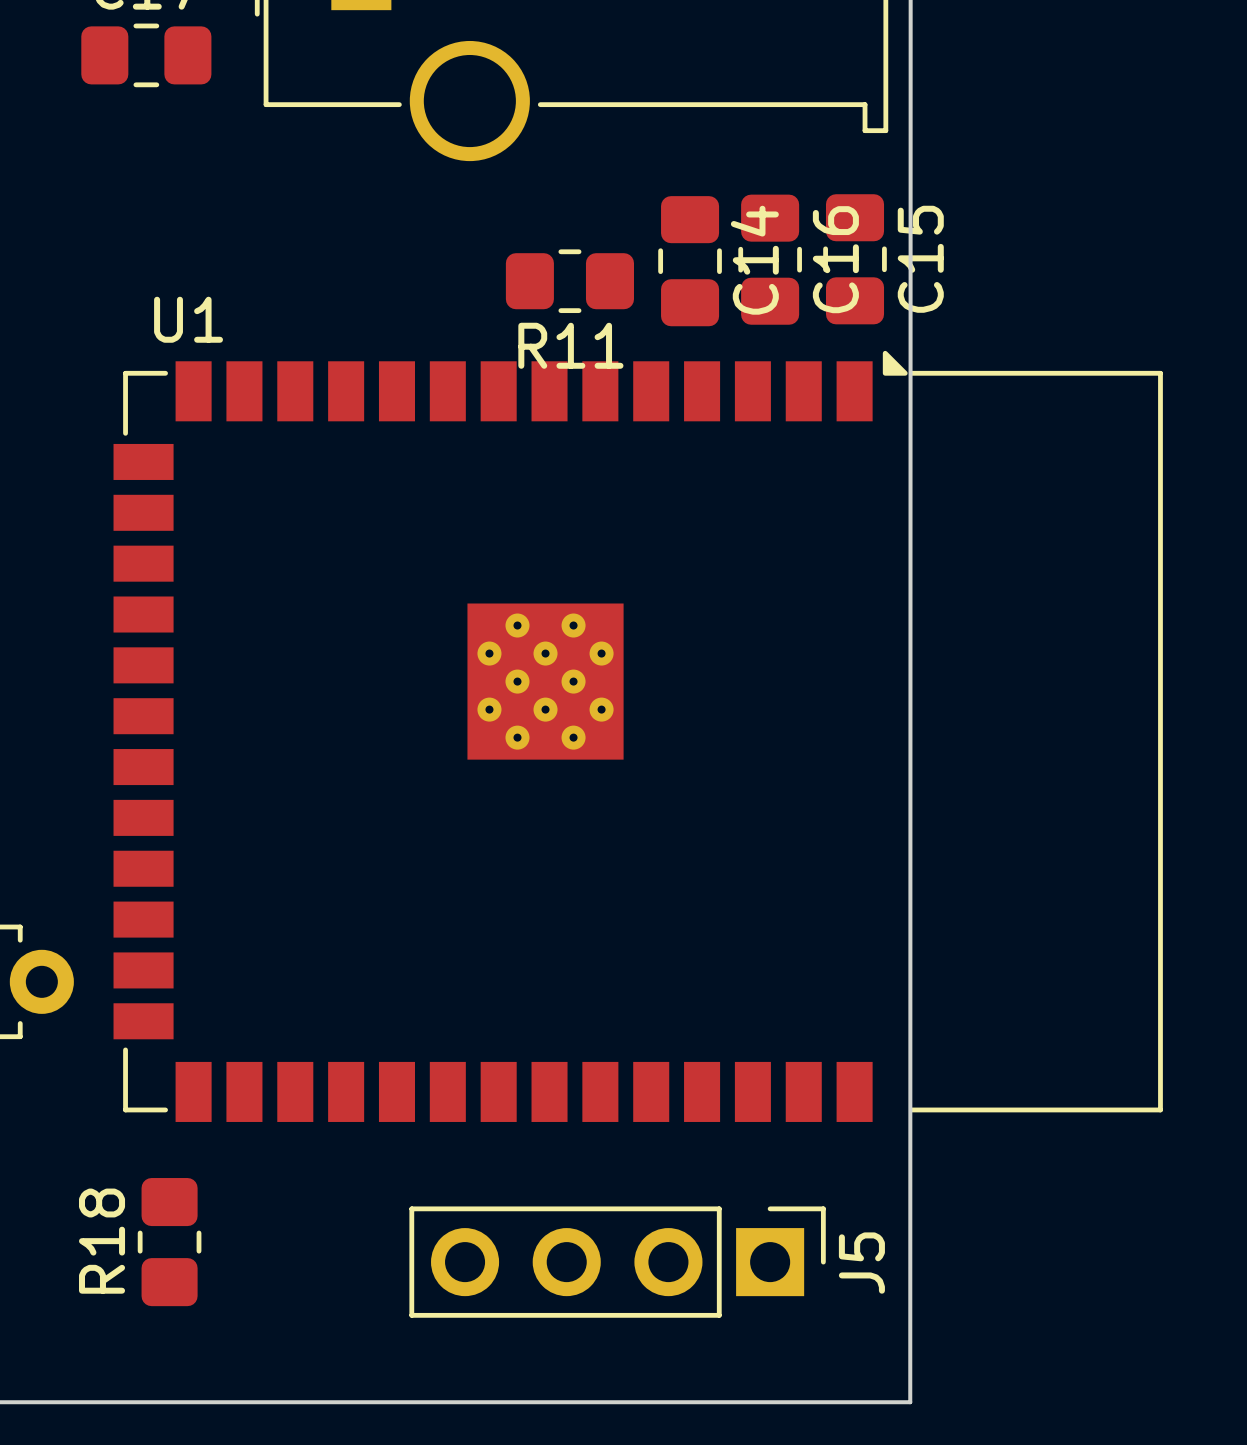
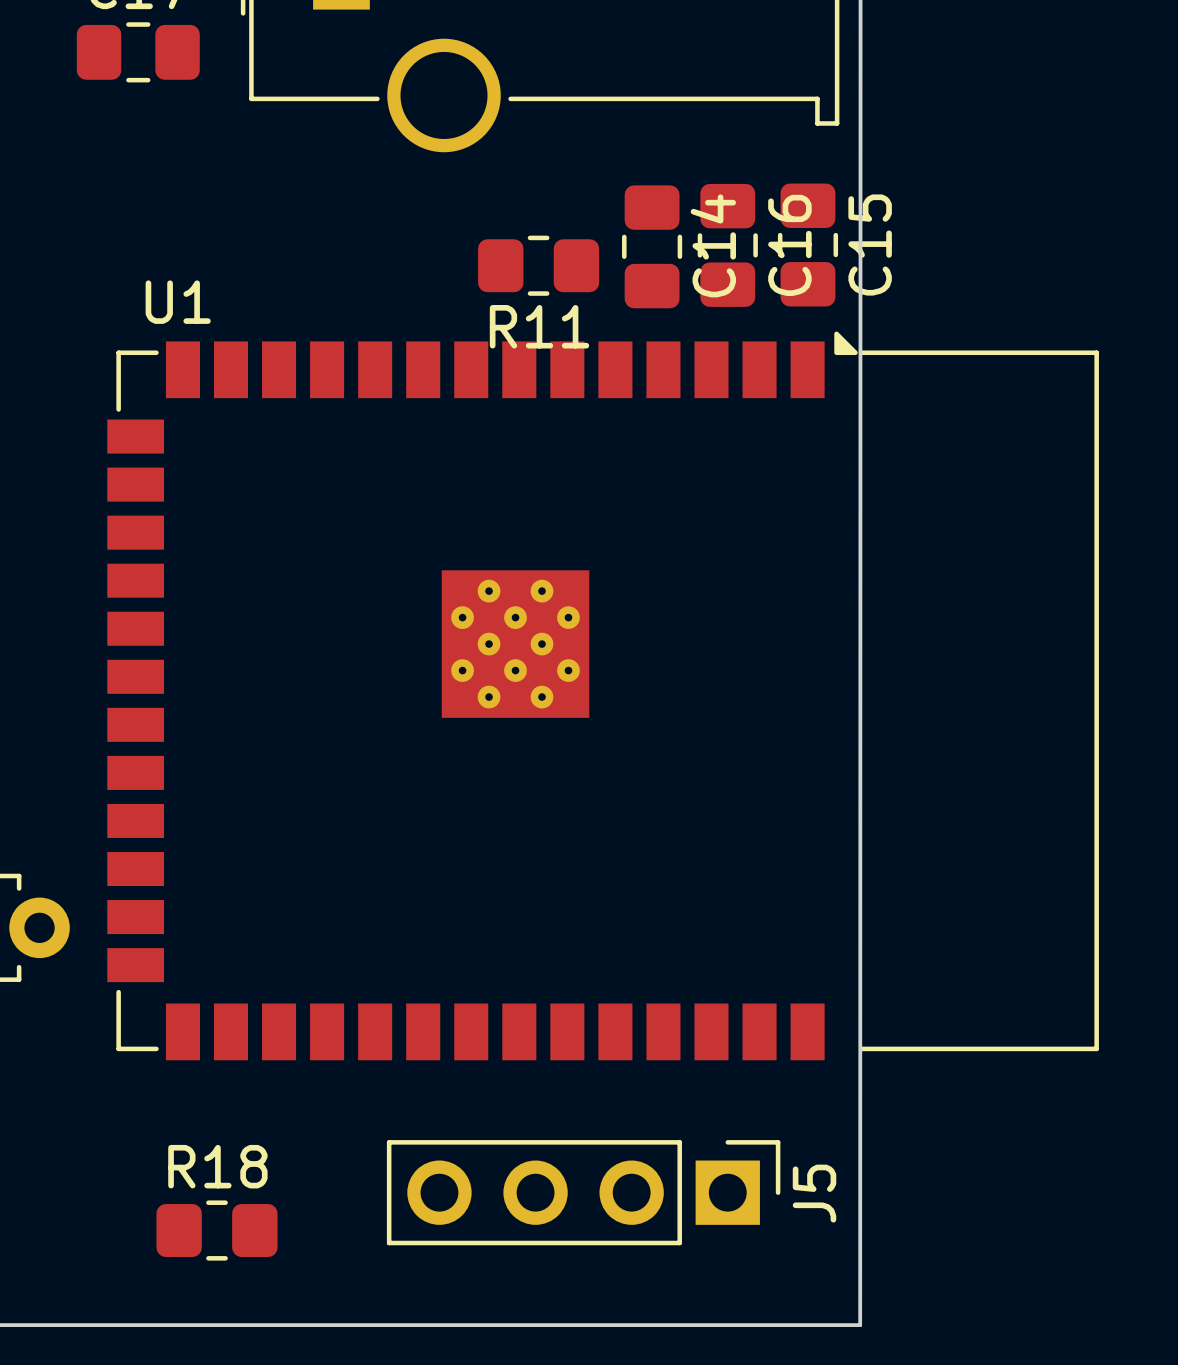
R18 rotation: 0° (169, 1242) -> 90° clockwise (217, 1230)
R18 position: (169, 1242) -> (217, 1230)

